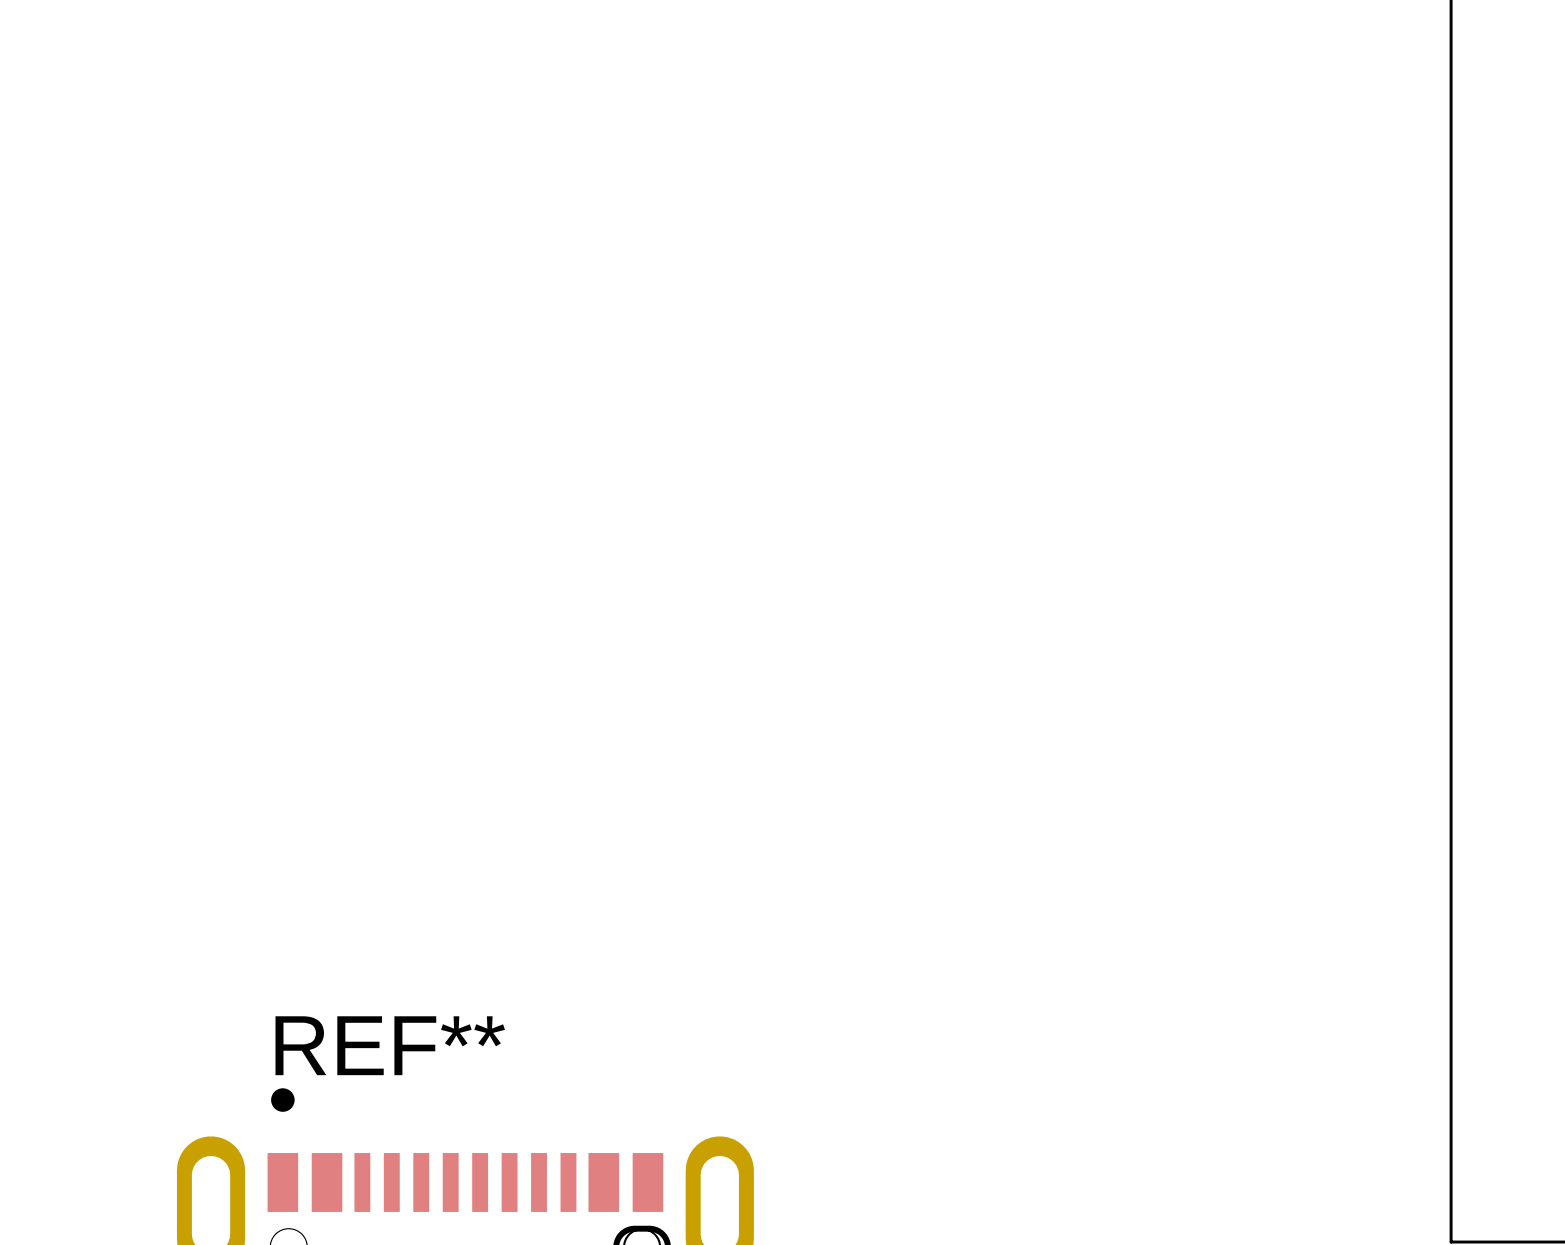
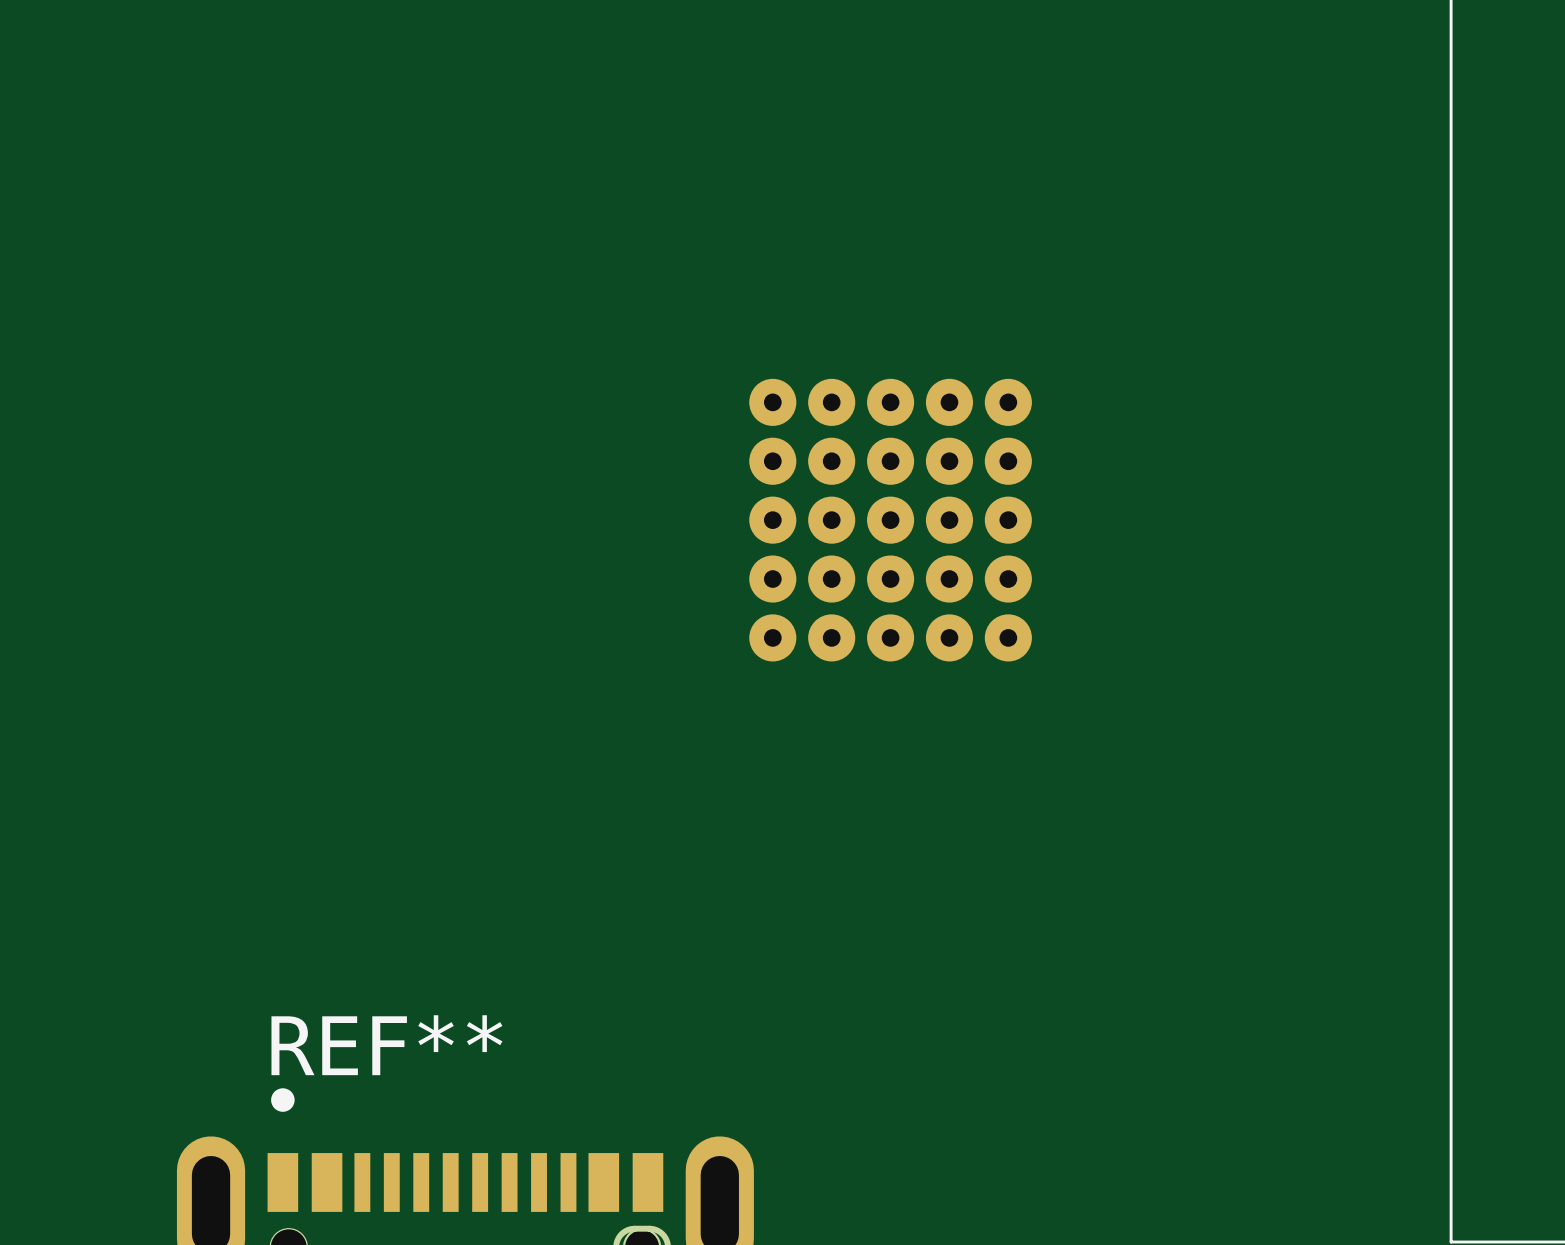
part: none -> (890, 520)

